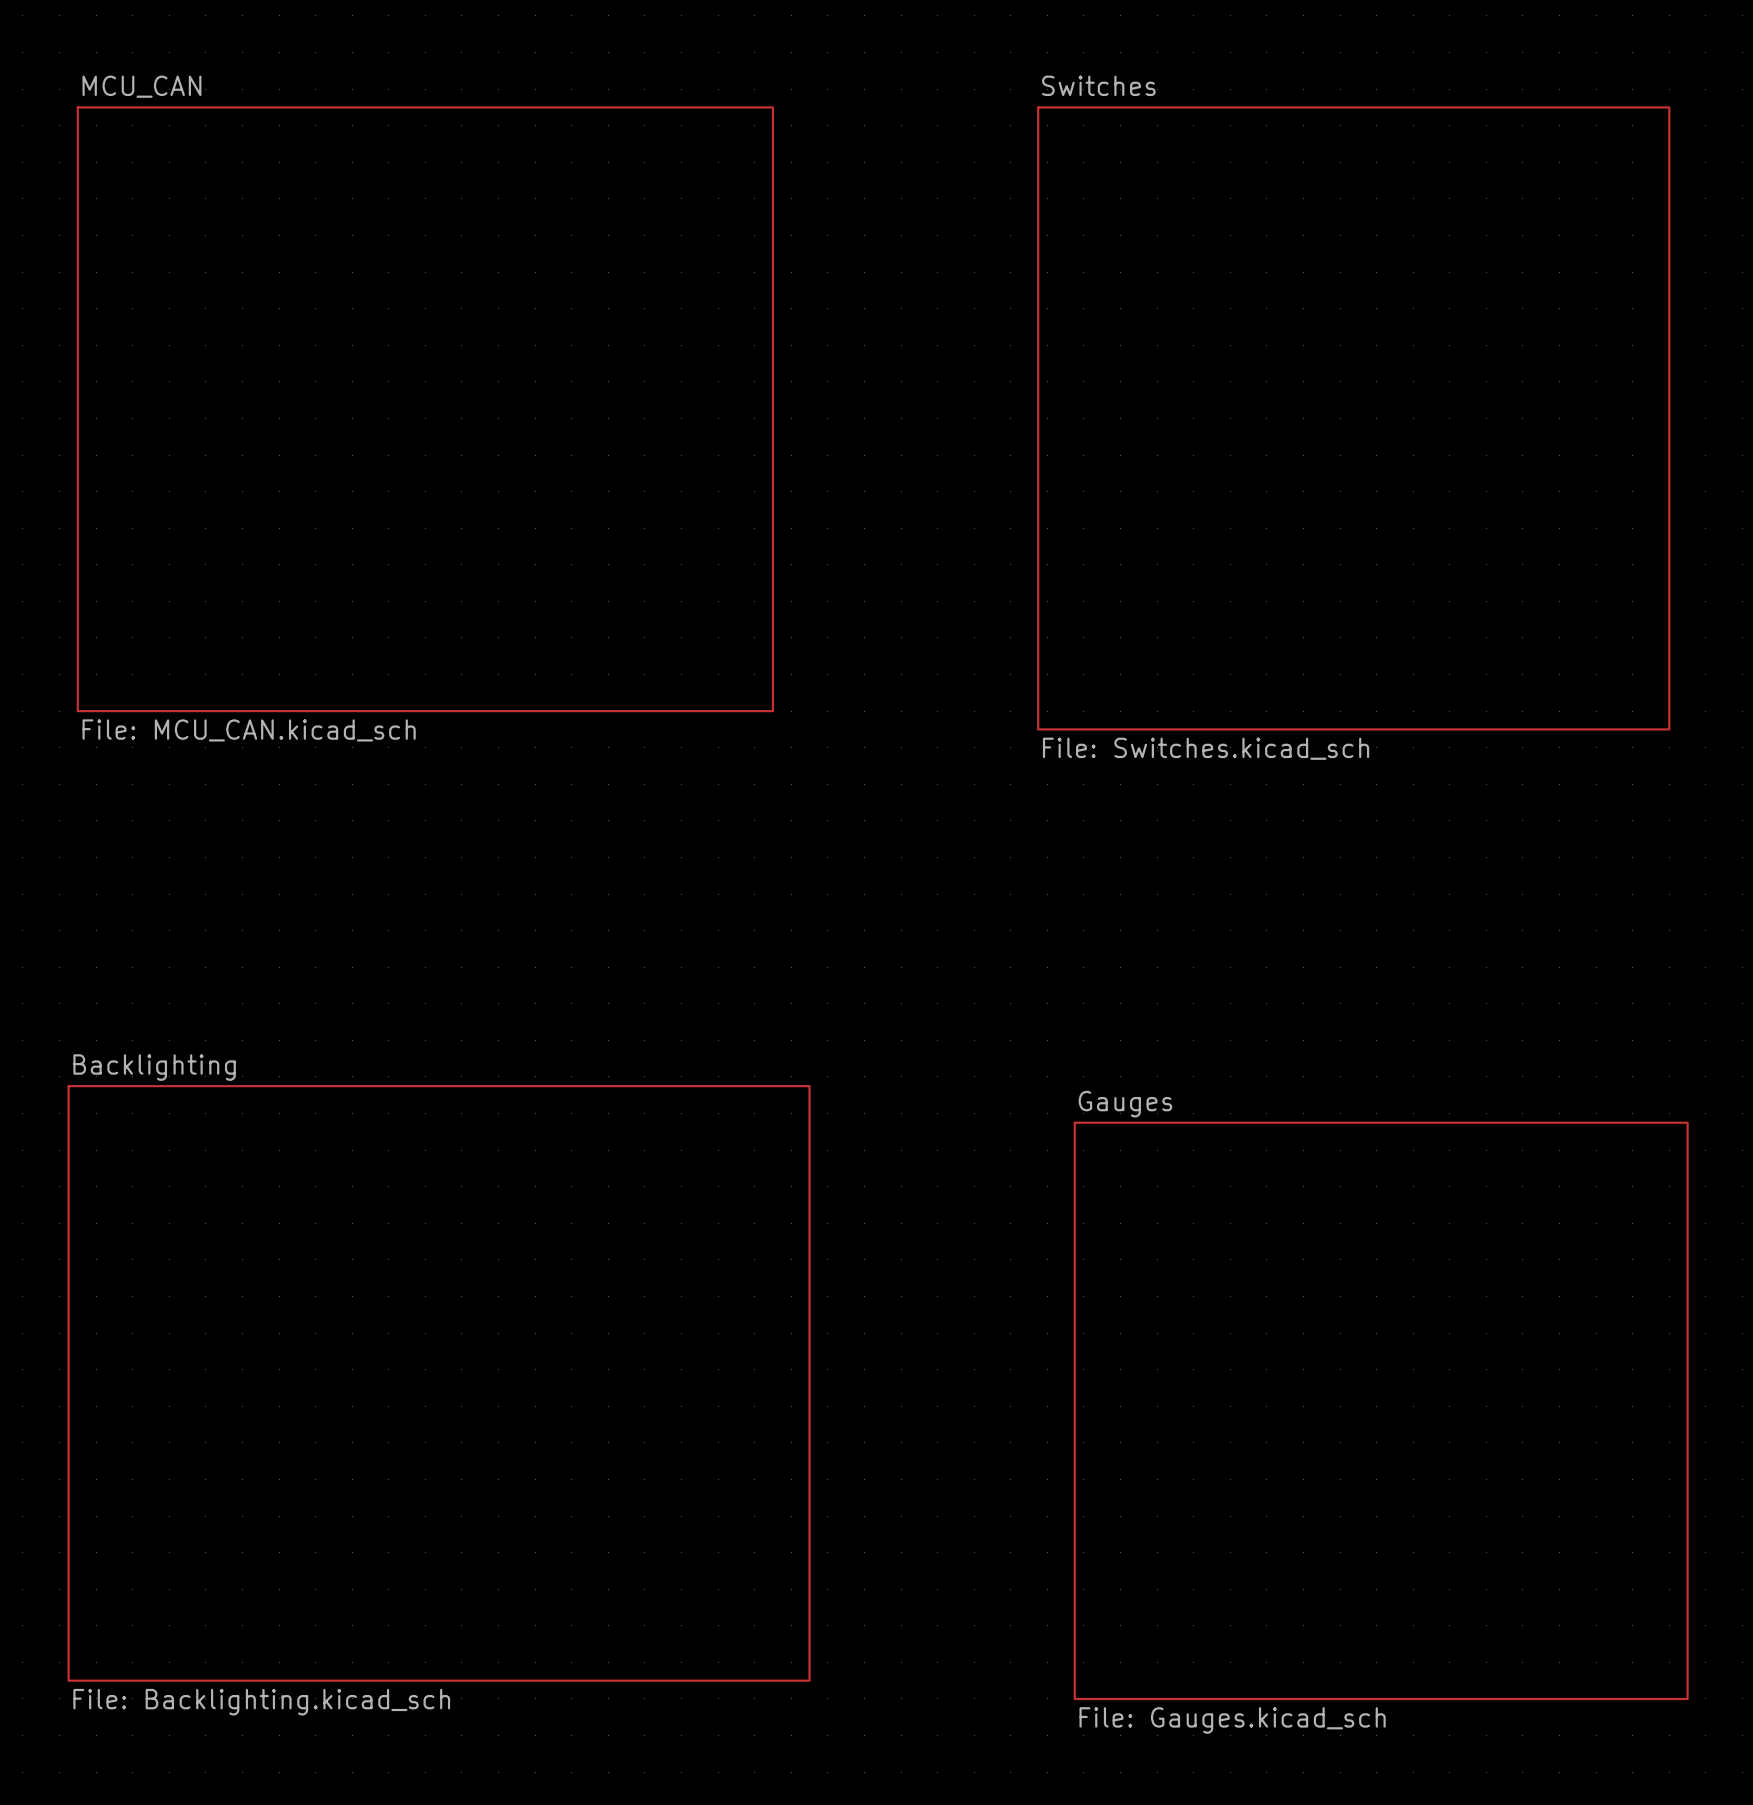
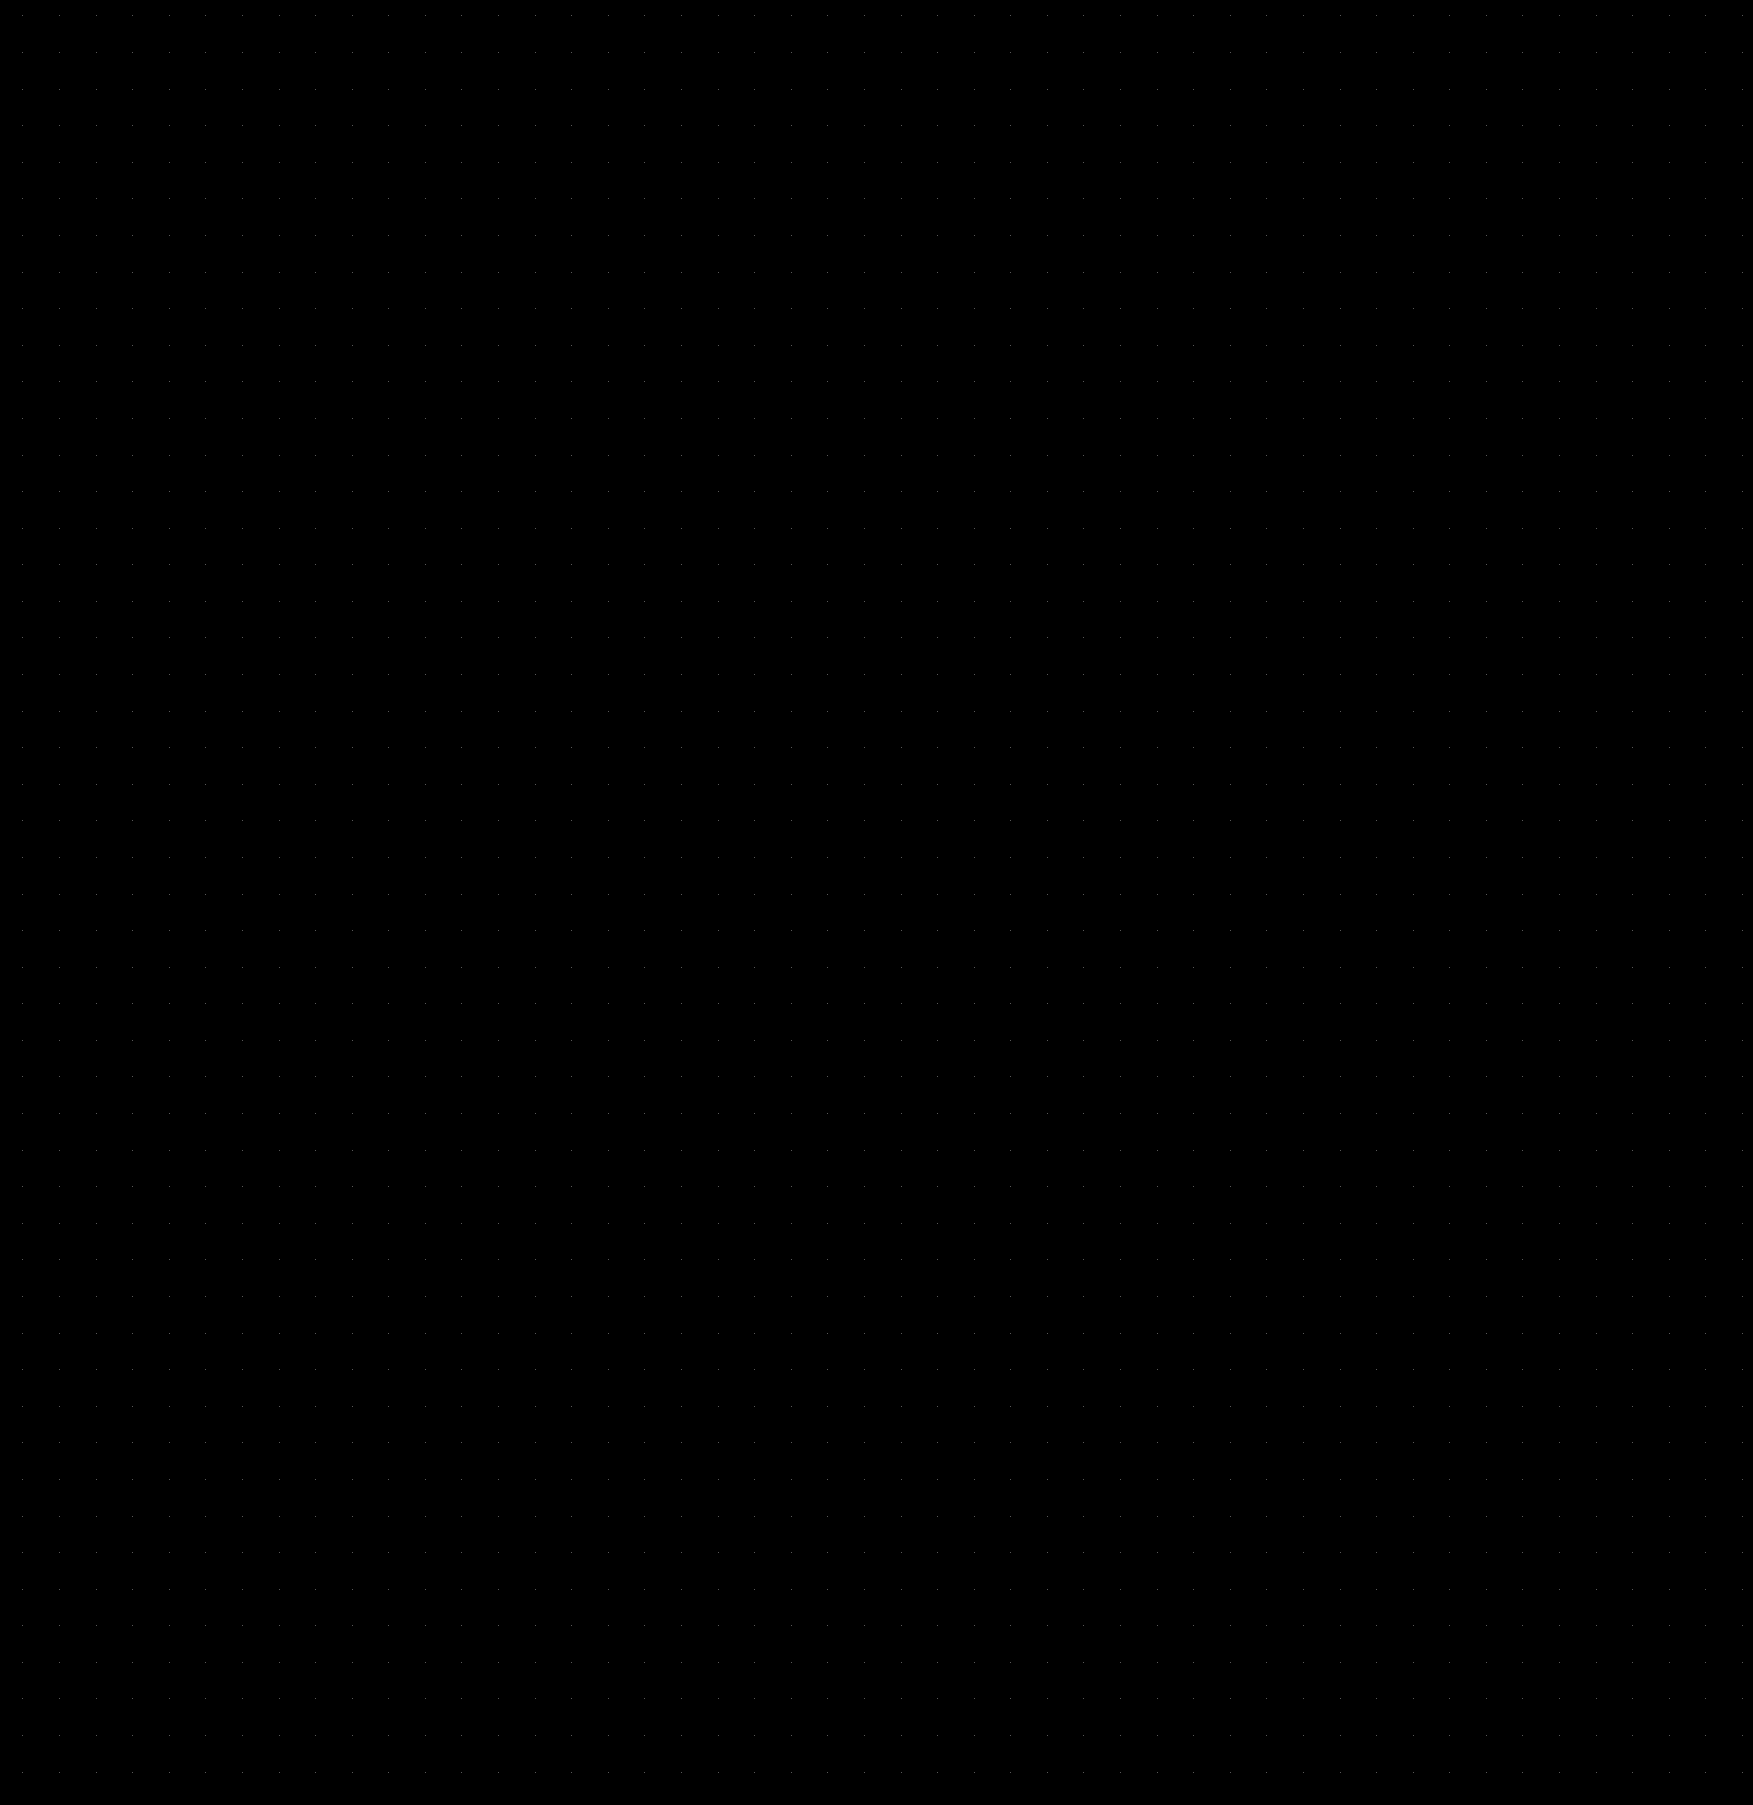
sheet MCU_CAN: File: MCU_CAN.kicad_sch (425, 409) -> none
sheet Switches: File: Switches.kicad_sch (1353, 418) -> none
sheet Backlighting: File: Backlighting.kicad_sch (439, 1383) -> none
sheet Gauges: File: Gauges.kicad_sch (1381, 1410) -> none

